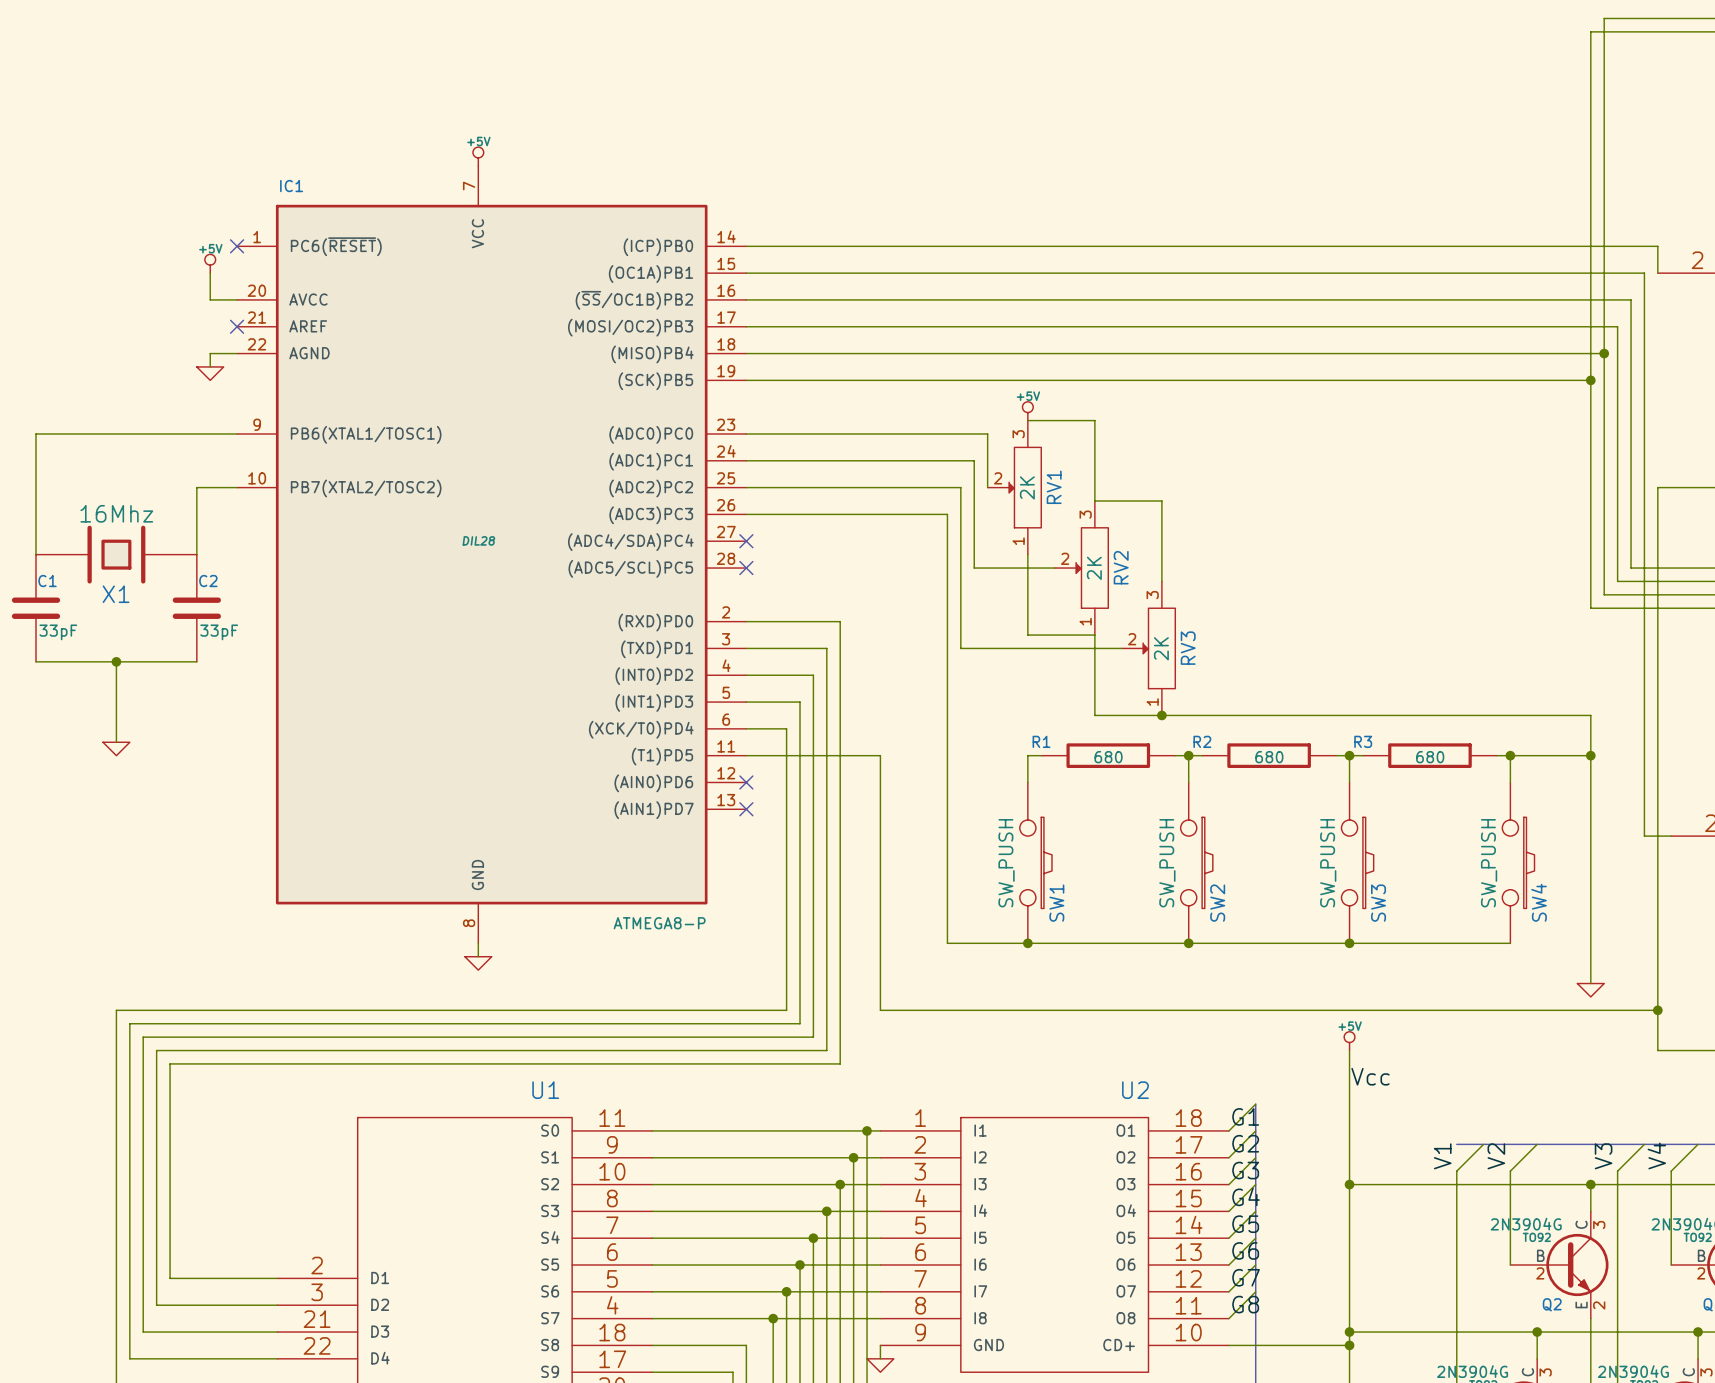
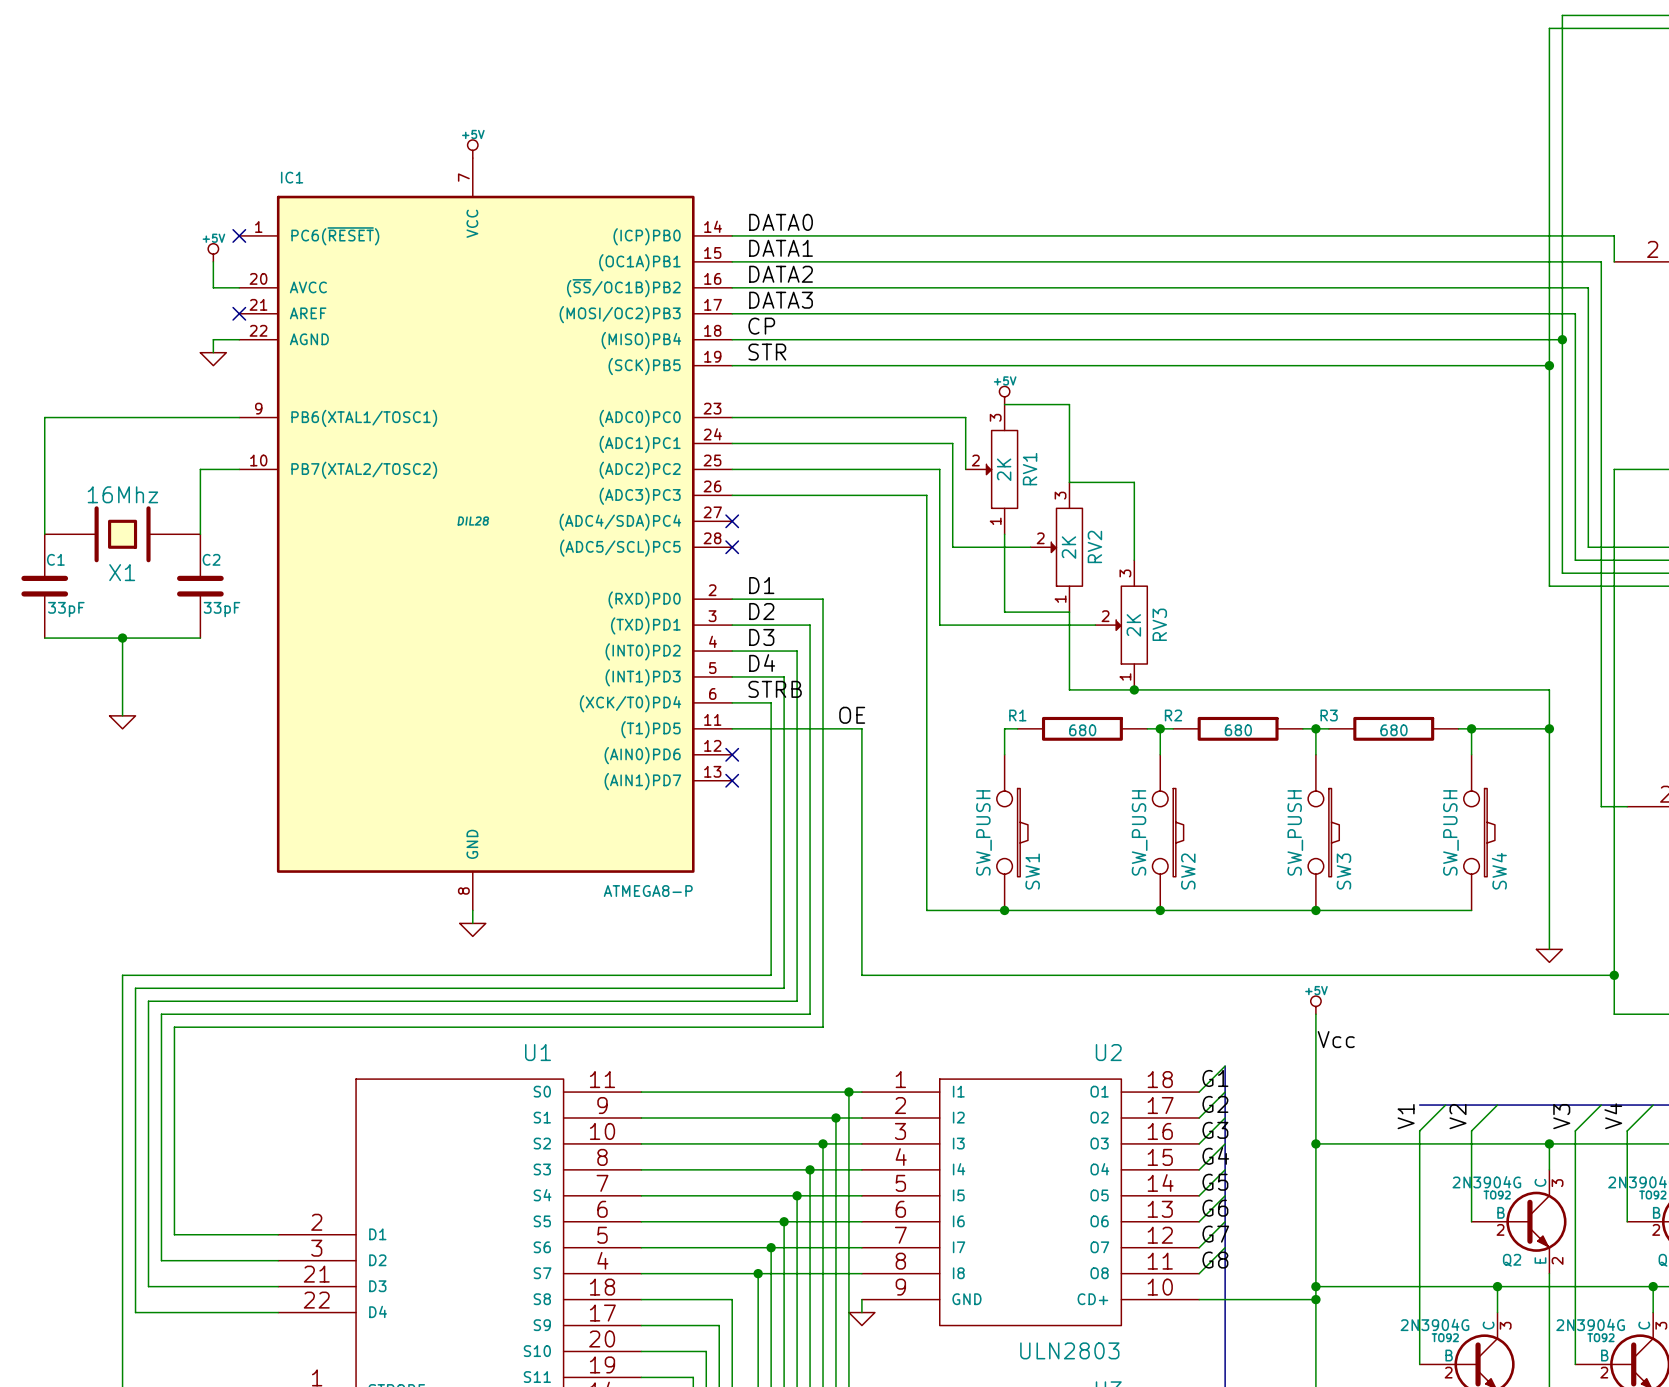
label: none -> DATA0 (781, 222)
label: none -> DATA1 (781, 248)
label: none -> DATA2 (781, 274)
label: none -> DATA3 (781, 300)
label: none -> CP (761, 326)
label: none -> STR (767, 352)
label: none -> D1 (761, 585)
label: none -> D2 (761, 611)
label: none -> D3 (761, 637)
label: none -> D4 (762, 663)
label: none -> STRB (775, 689)
label: none -> OE (852, 715)

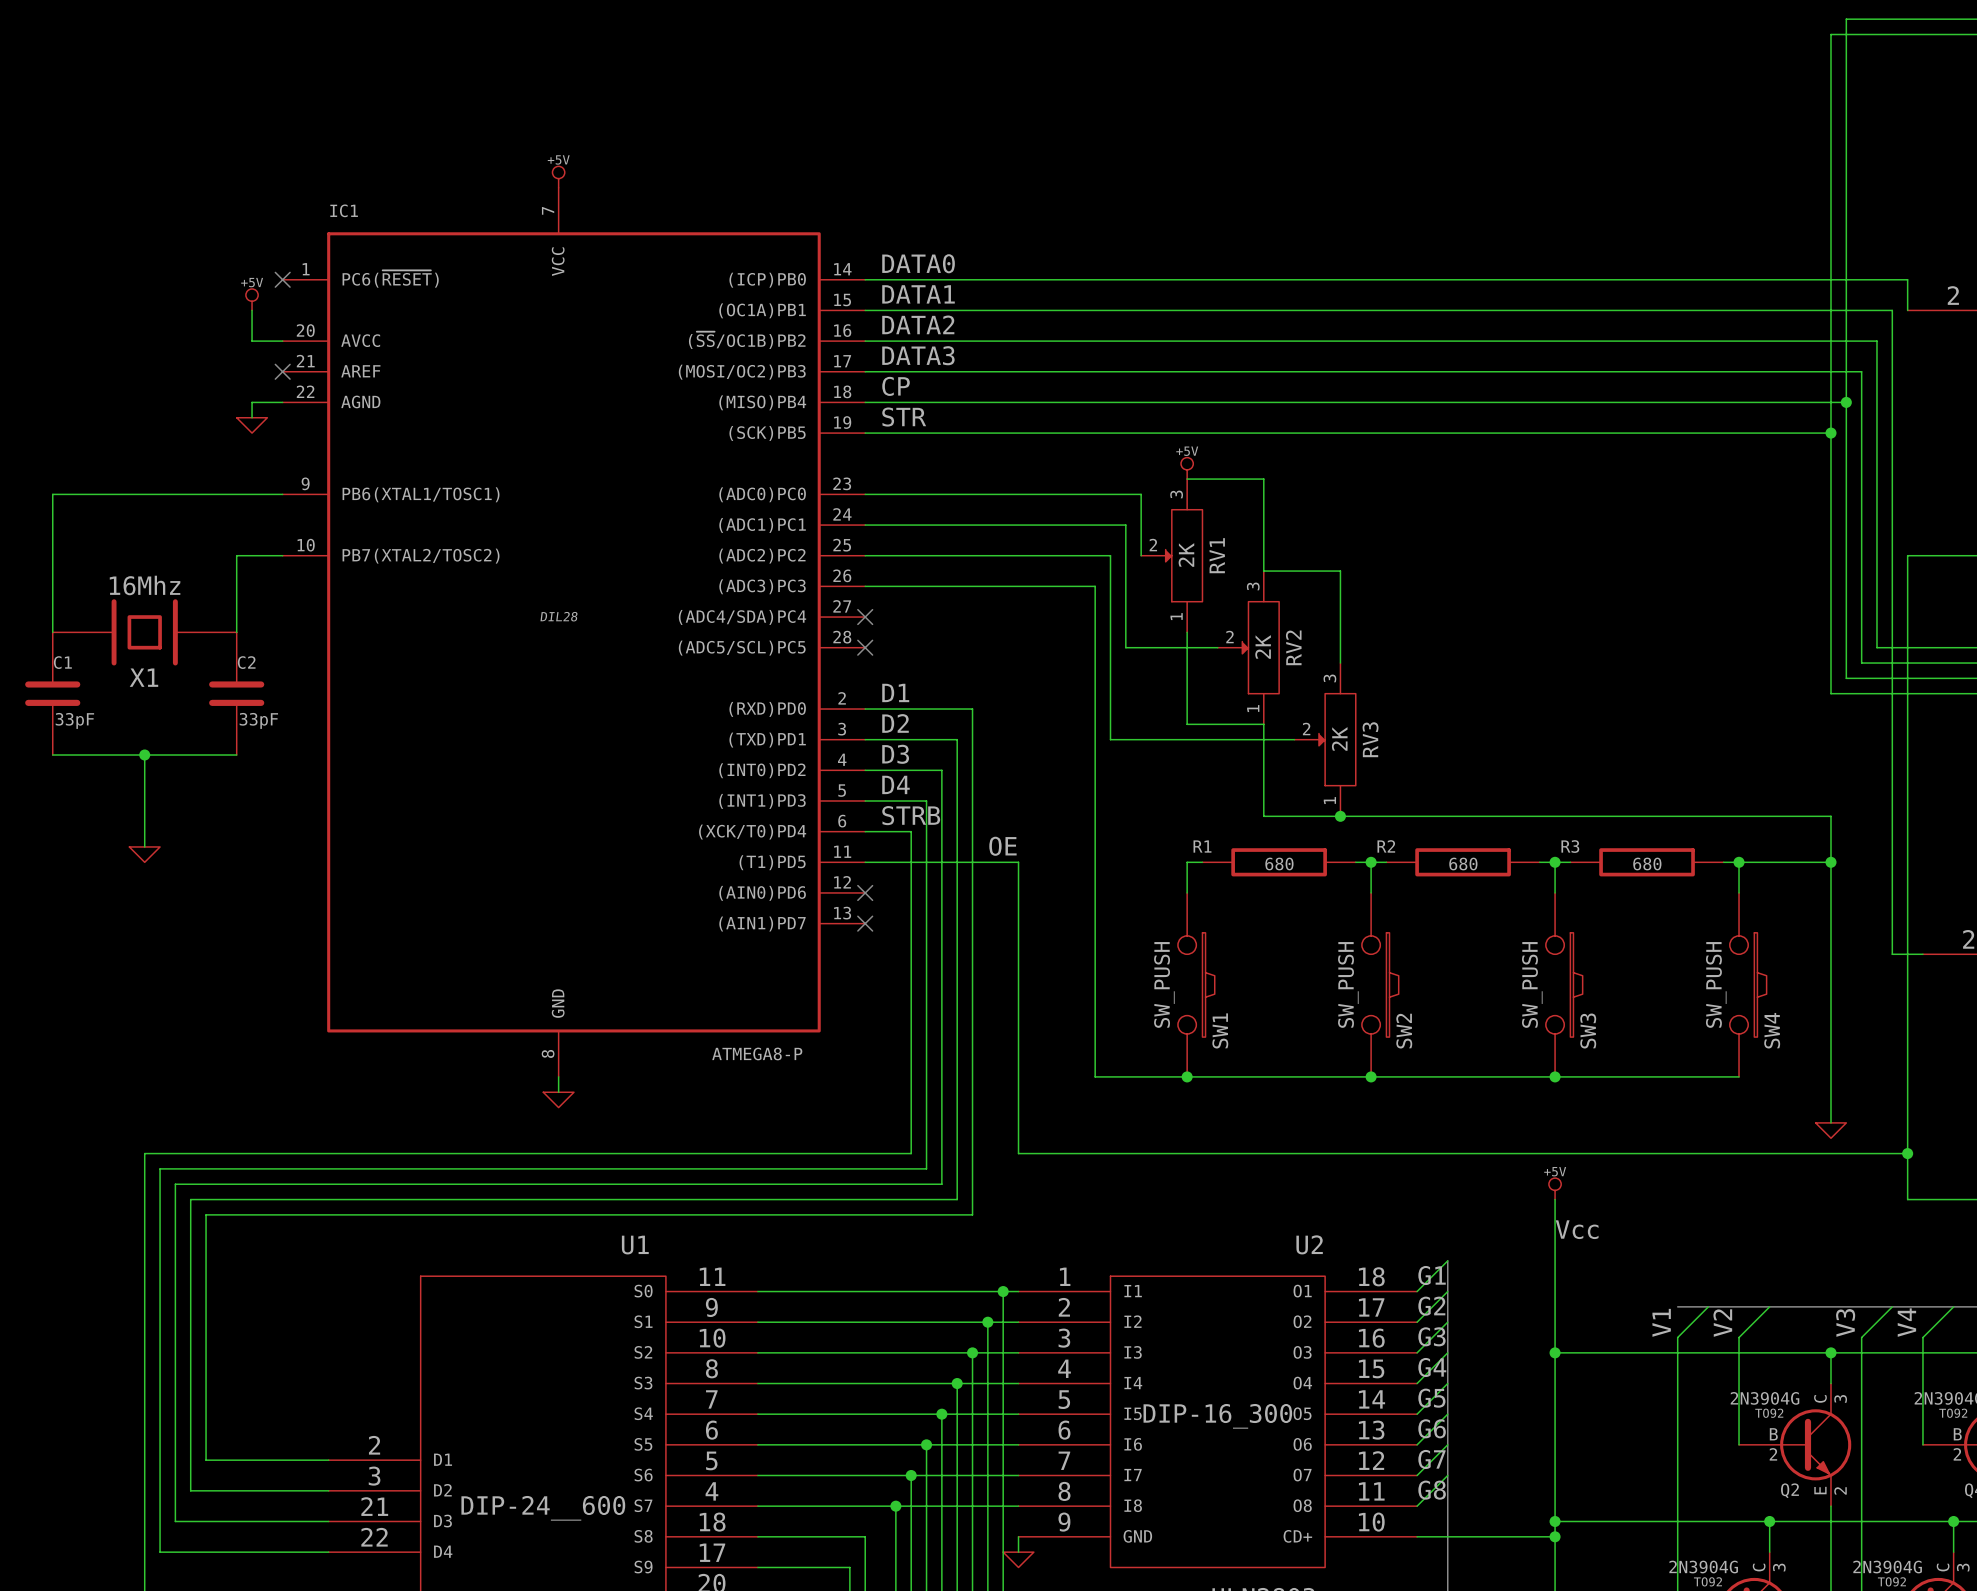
U2 text: none -> DIP-16_300 (1217, 1416)
U1 text: none -> DIP-24__600 (543, 1508)

